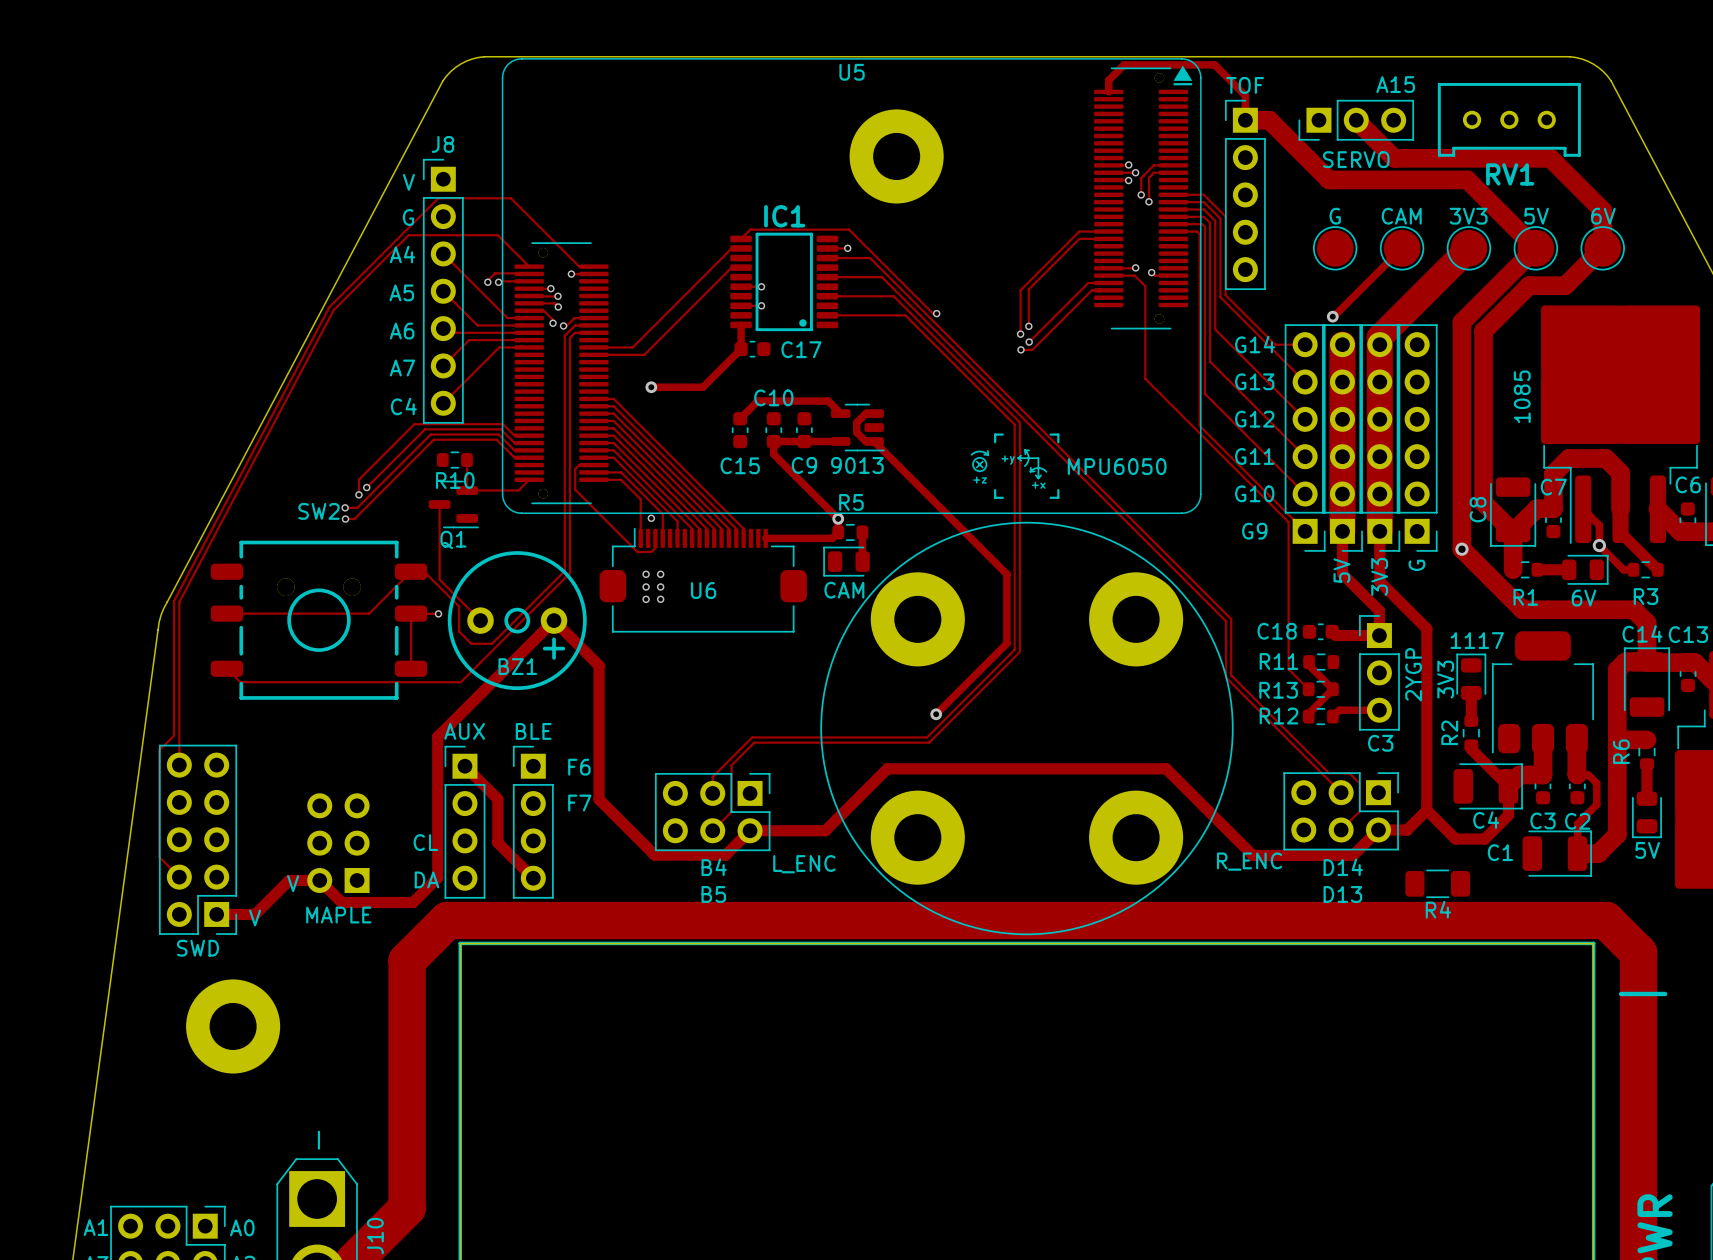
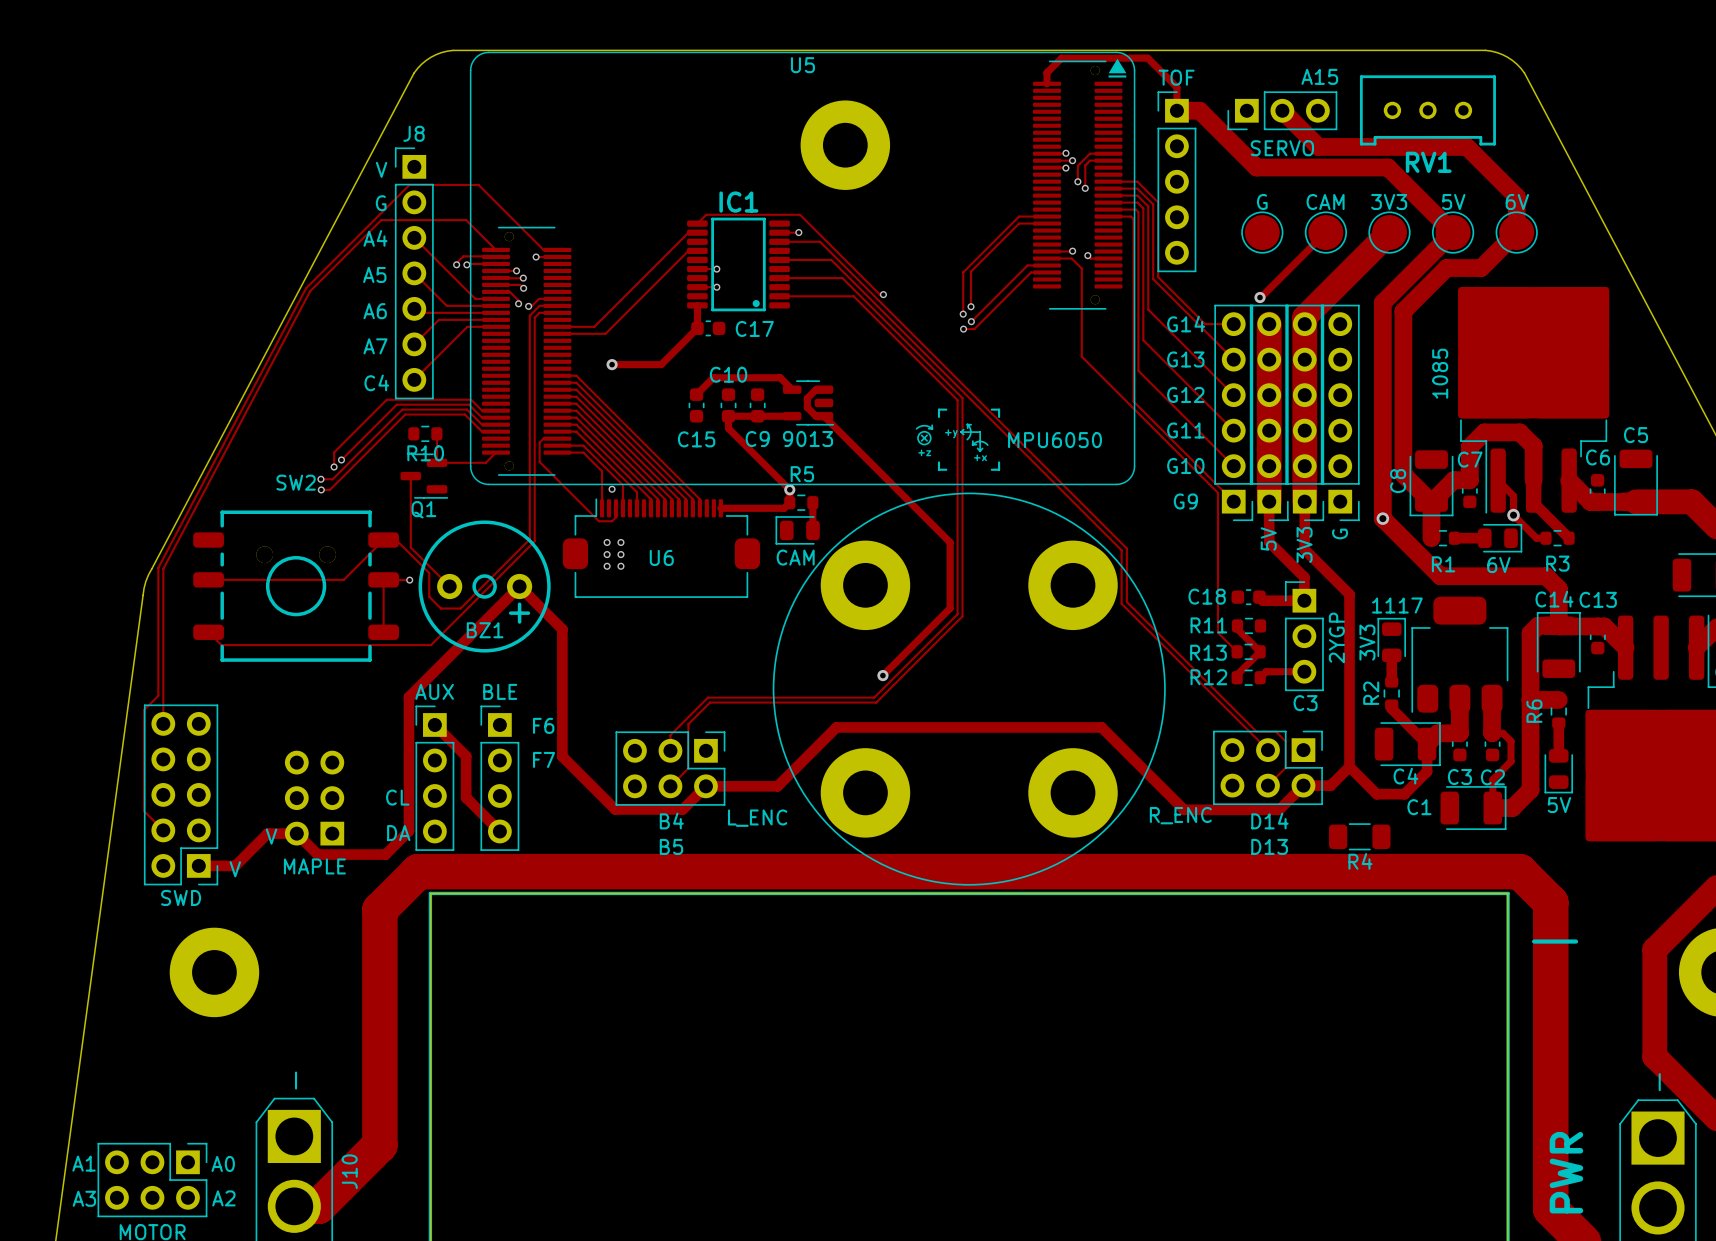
track: (1192, 580) (1231, 619) (1231, 675) -> (1126, 548) (1126, 602) (1163, 638)
track: (1187, 582) (1226, 621) (1226, 677) -> (1121, 550) (1121, 603) (1158, 640)

